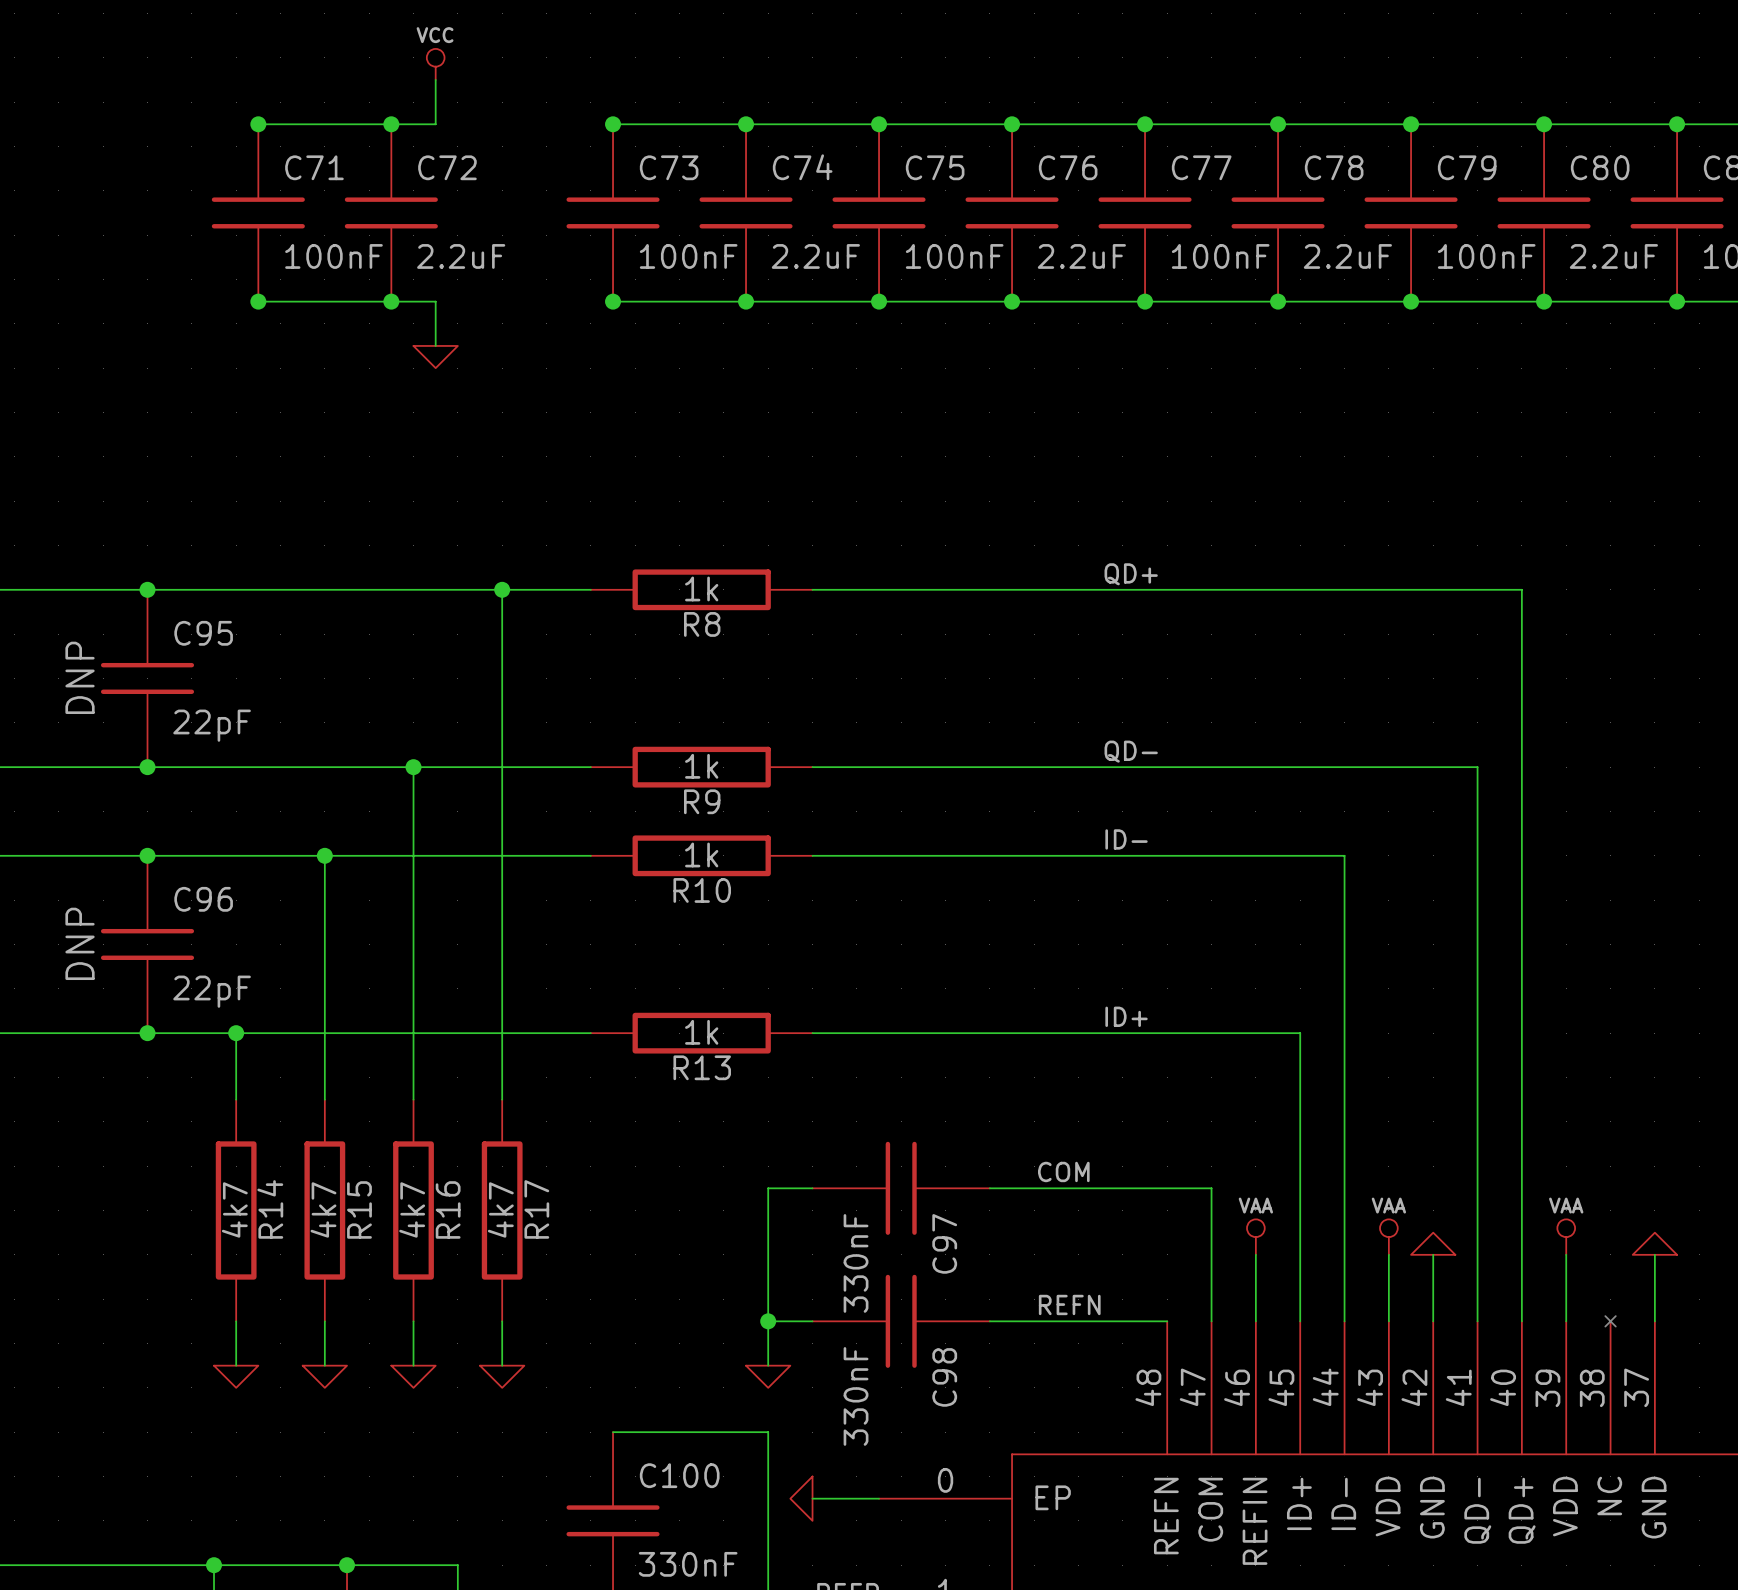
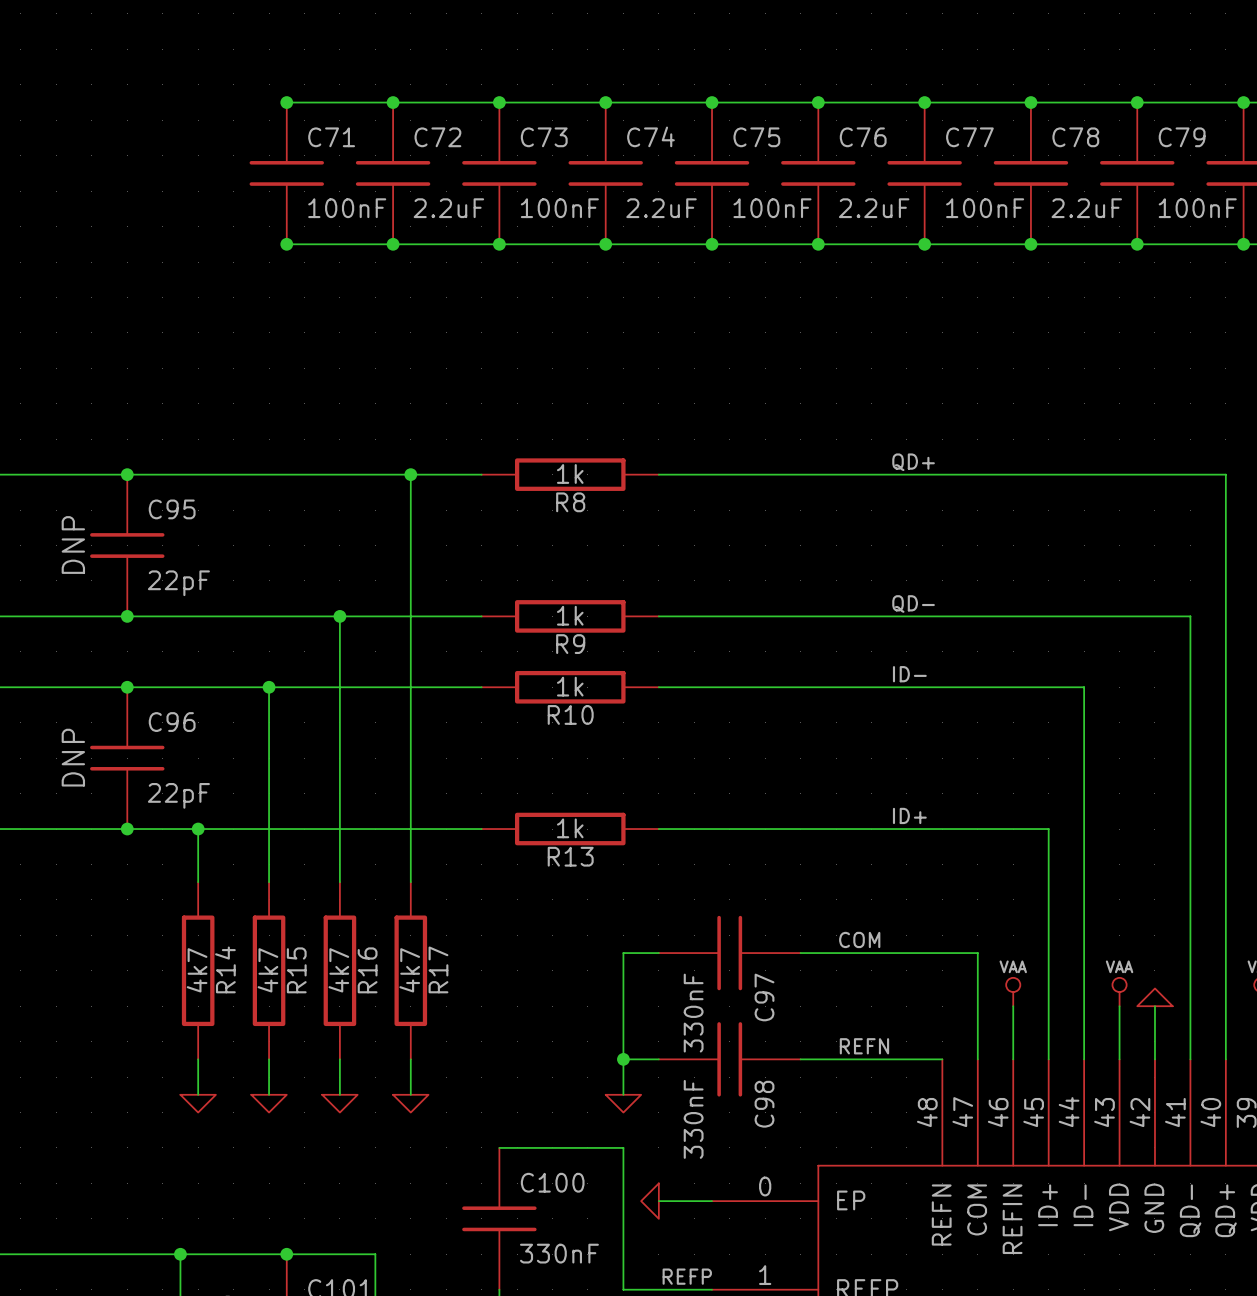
power symbol: VCC (435, 64) -> none
wire: (435, 79) (435, 124) -> (499, 102) (357, 102)
wire: (258, 124) (347, 124) -> none
junction: (258, 124) -> none
junction: none -> (286, 102)
junction: (391, 124) -> none
junction: none -> (393, 102)
C71 position: (258, 212) -> (286, 173)
C72 position: (391, 212) -> (393, 173)
wire: (258, 301) (347, 301) -> none
junction: (258, 301) -> none
junction: none -> (286, 244)
junction: (391, 301) -> none
wire: (435, 301) (435, 345) -> (357, 244) (499, 244)
junction: none -> (393, 244)
power symbol: (435, 357) -> none

